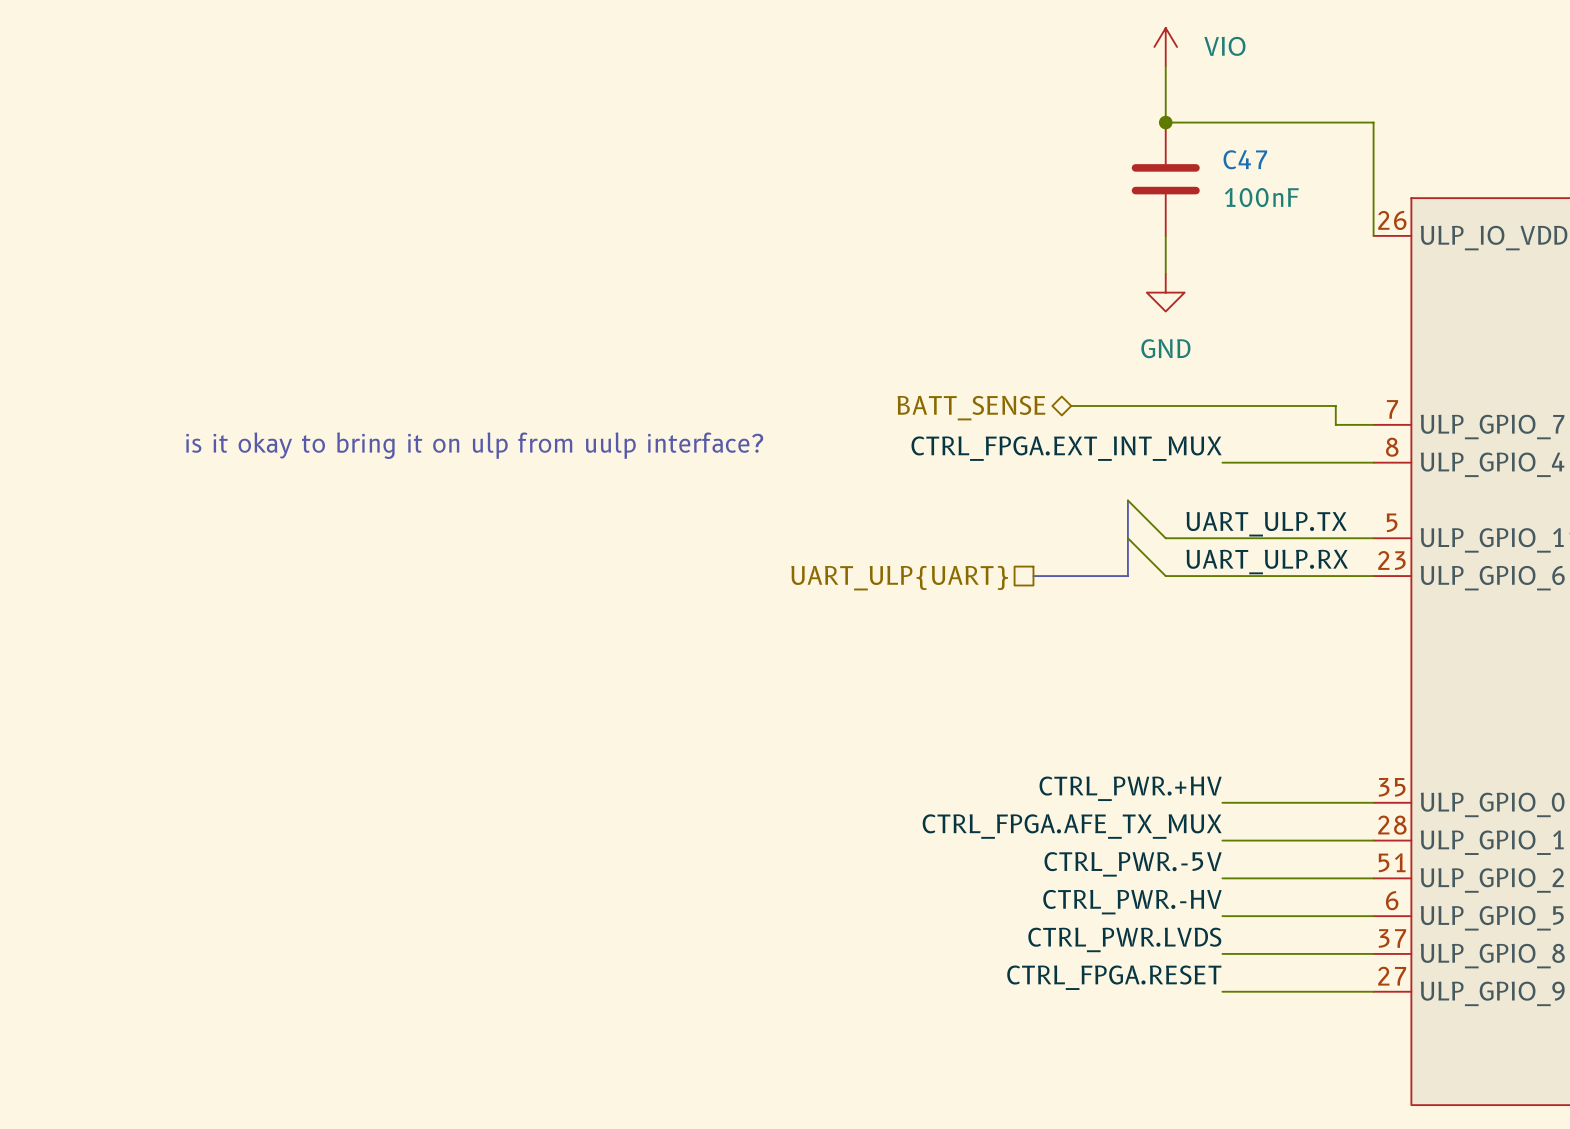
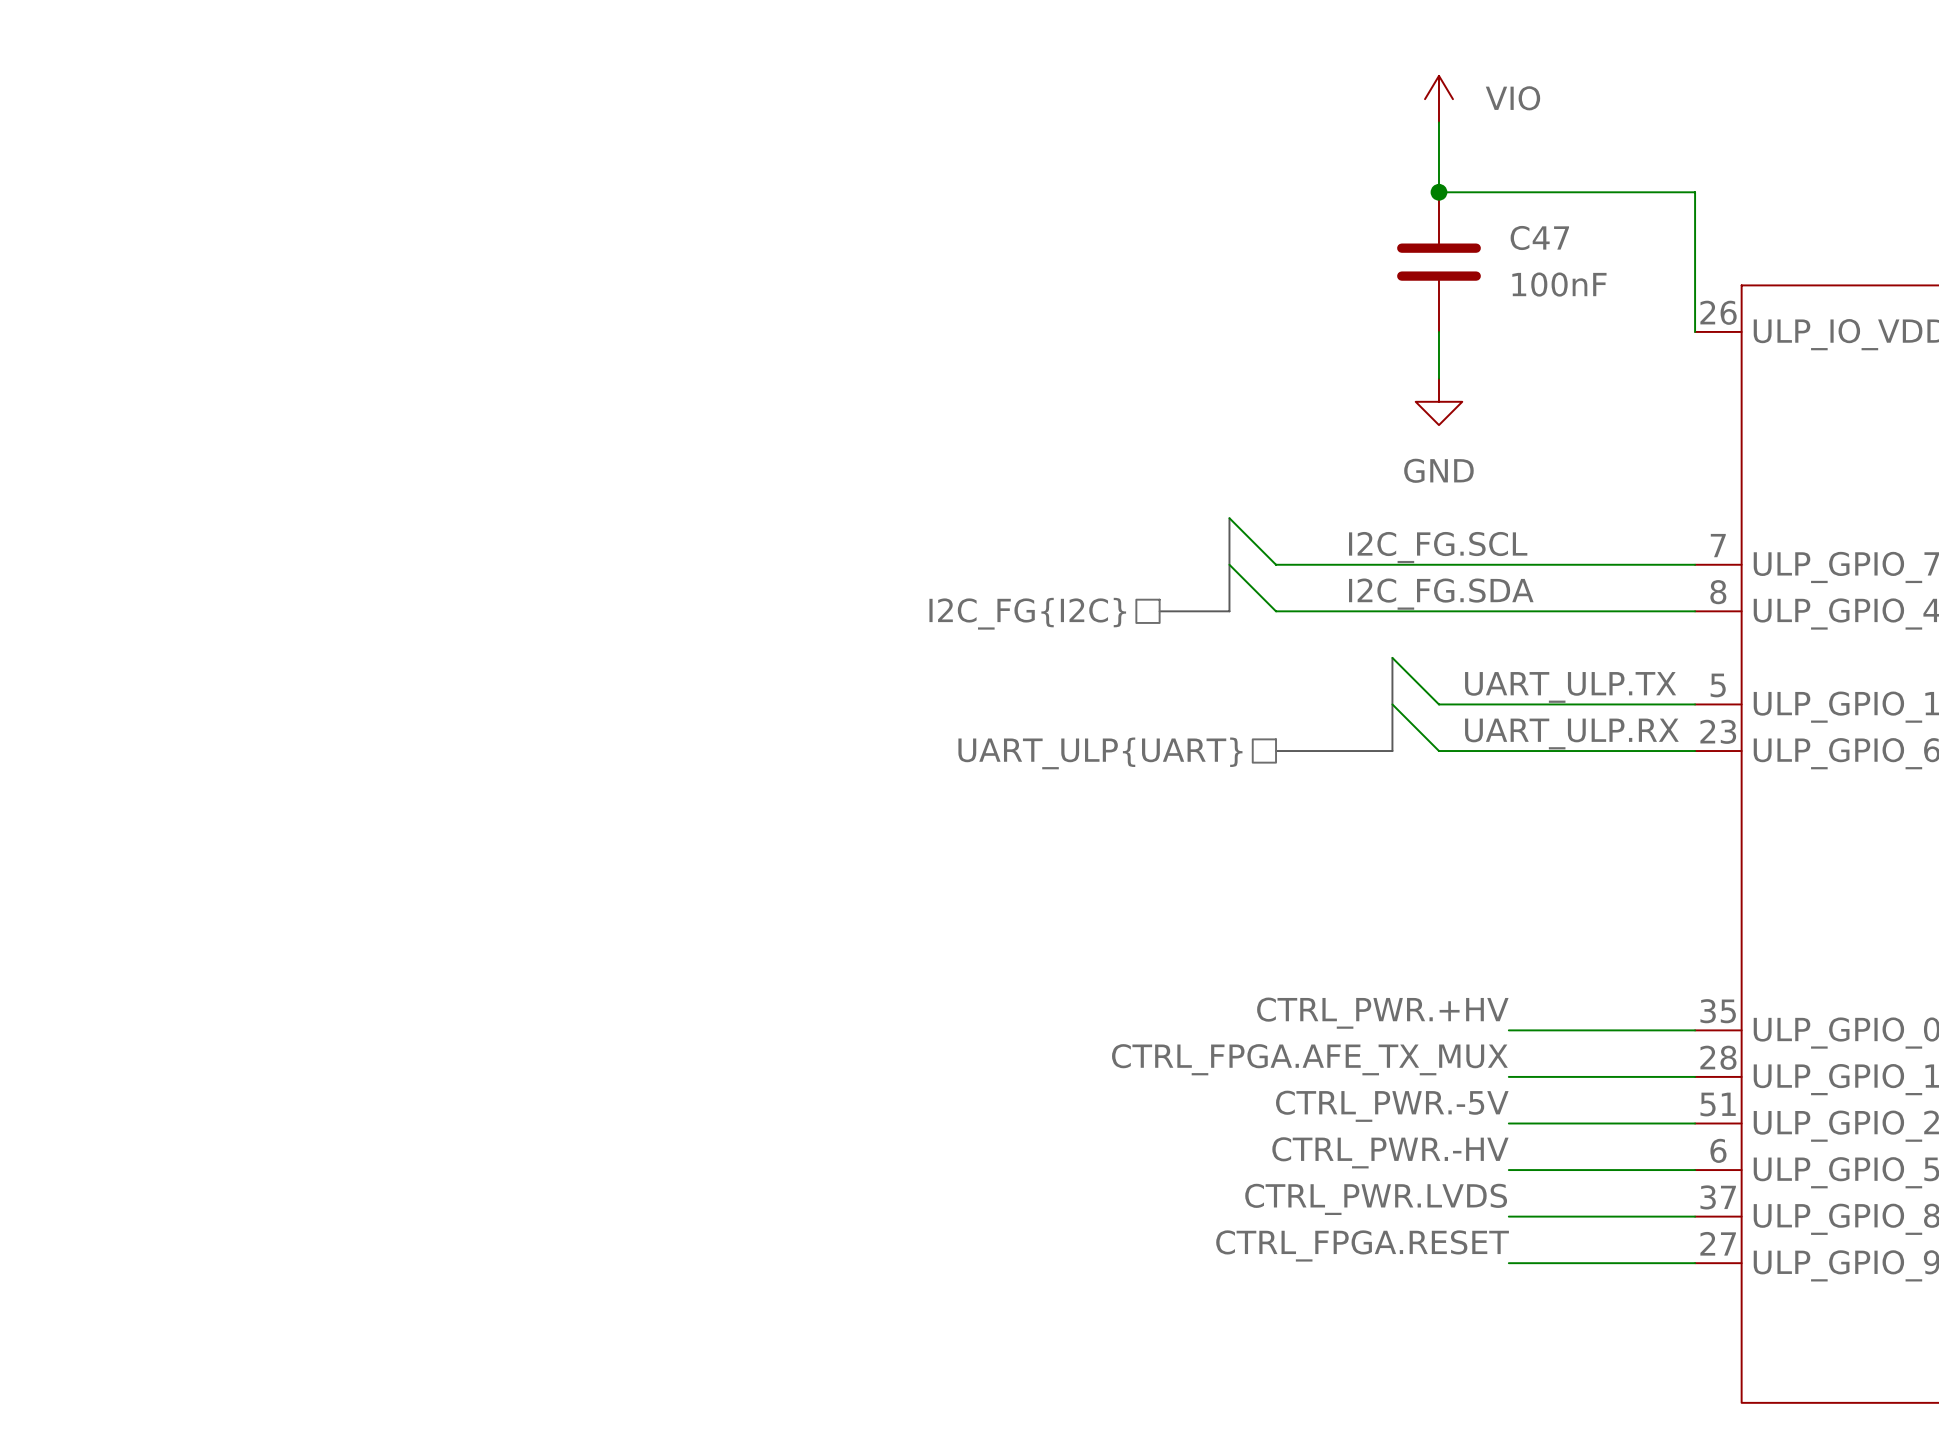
bus: none -> (1229, 518) (1229, 611) (1159, 611)
wire: (1071, 405) (1335, 405) (1335, 424) -> (1229, 518) (1276, 564) (1648, 564)
hierarchical label: BATT_SENSE (971, 408) -> none
label: none -> I2C_FG.SCL (1438, 547)
wire: none -> (1229, 564) (1276, 611) (1508, 611)
text: is it okay to bring it on ulp from uulp interface? (474, 445) -> none
label: CTRL_FPGA.EXT_INT_MUX (1066, 448) -> none
label: none -> I2C_FG.SDA (1441, 594)
hierarchical label: none -> I2C_FG{I2C} (1027, 613)

